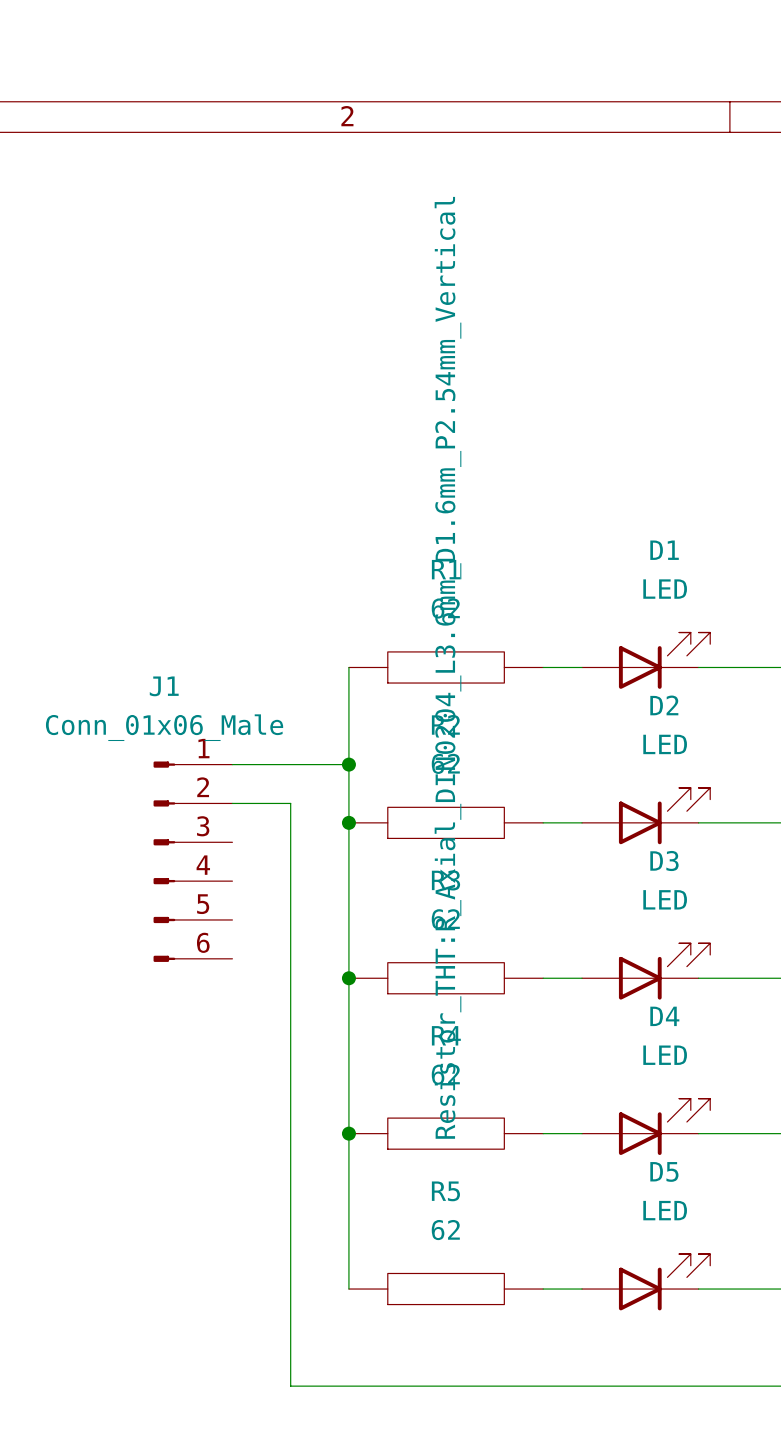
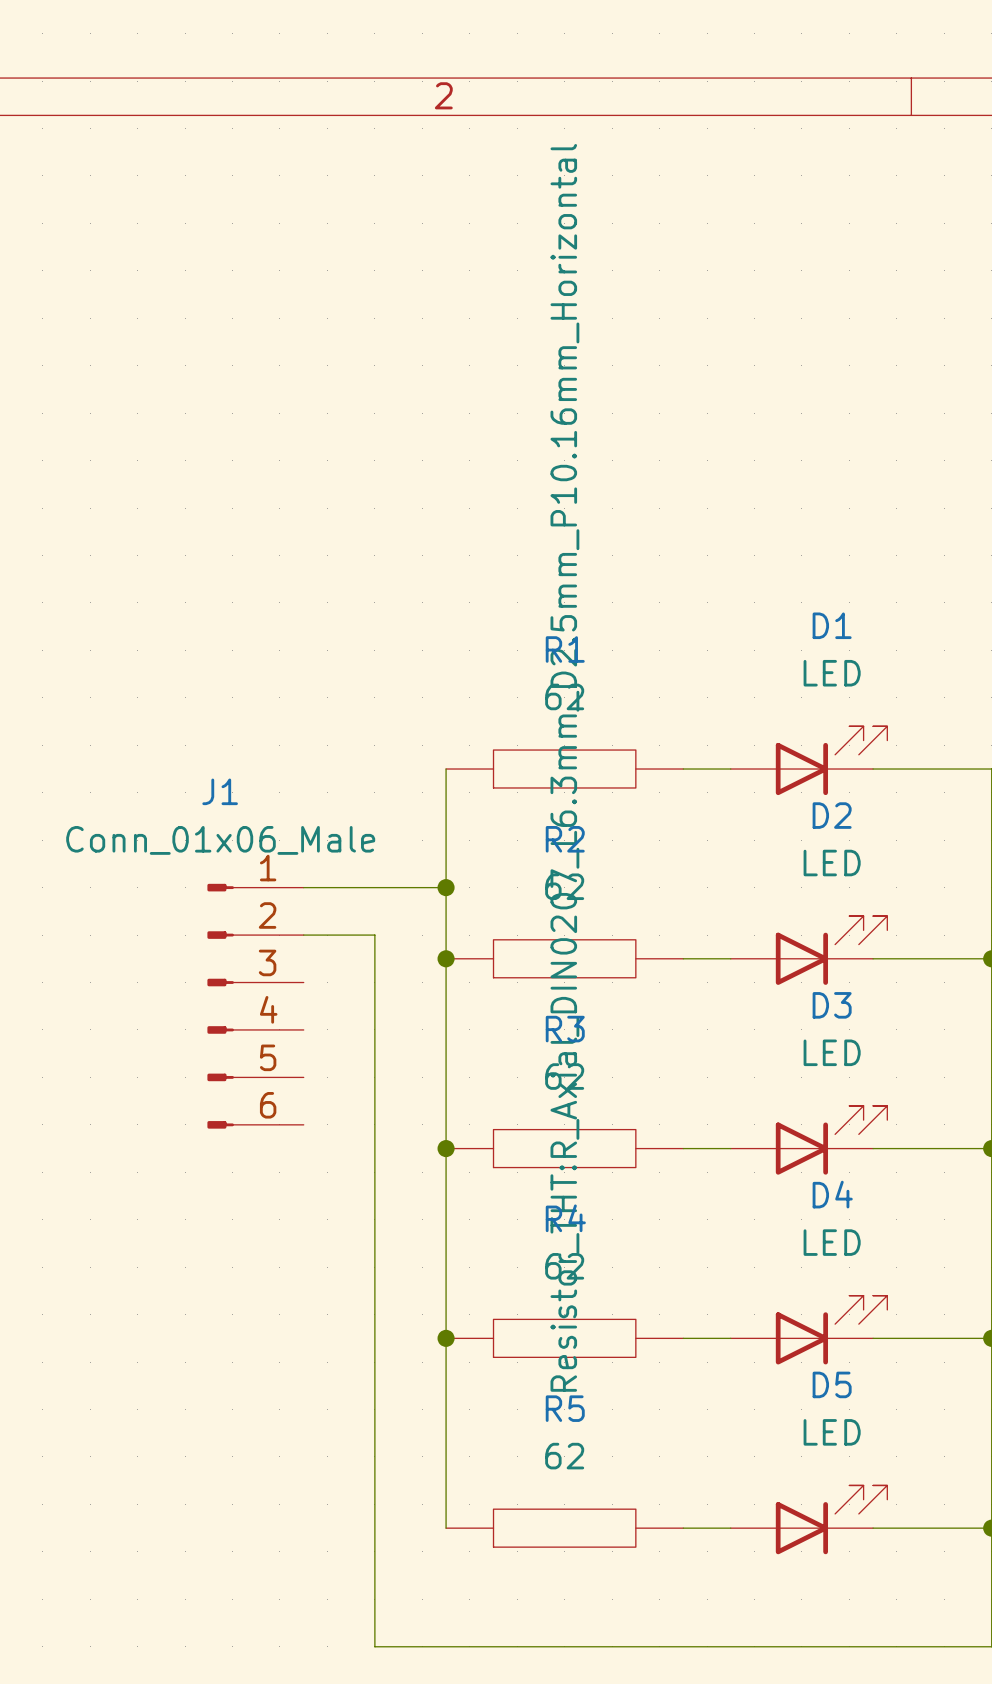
R1 text: Resistor_THT:R_Axial_DIN0204_L3.6mm_D1.6mm_P2.54mm_Vertical (448, 667) -> Resistor_THT:R_Axial_DIN0207_L6.3mm_D2.5mm_P10.16mm_Horizontal (564, 767)

